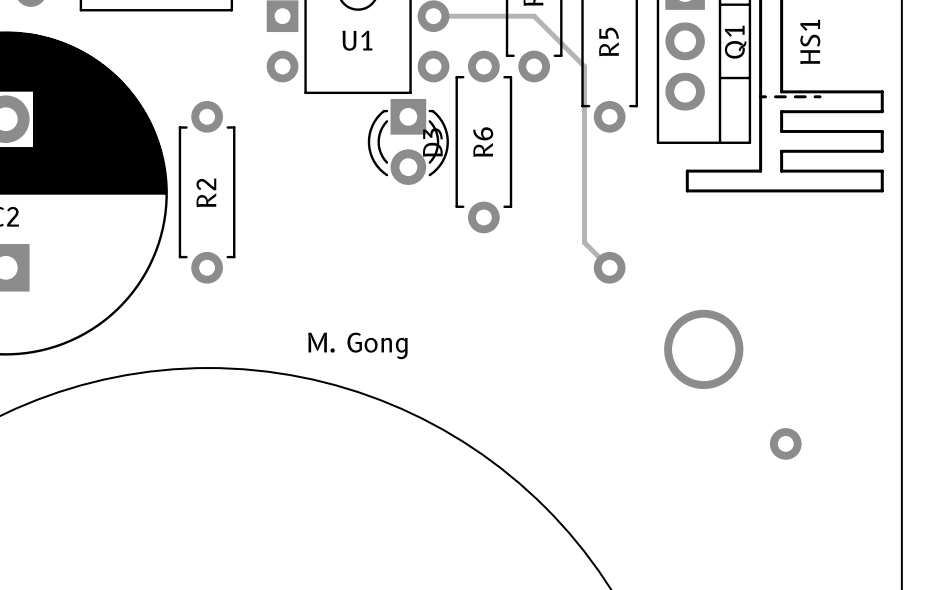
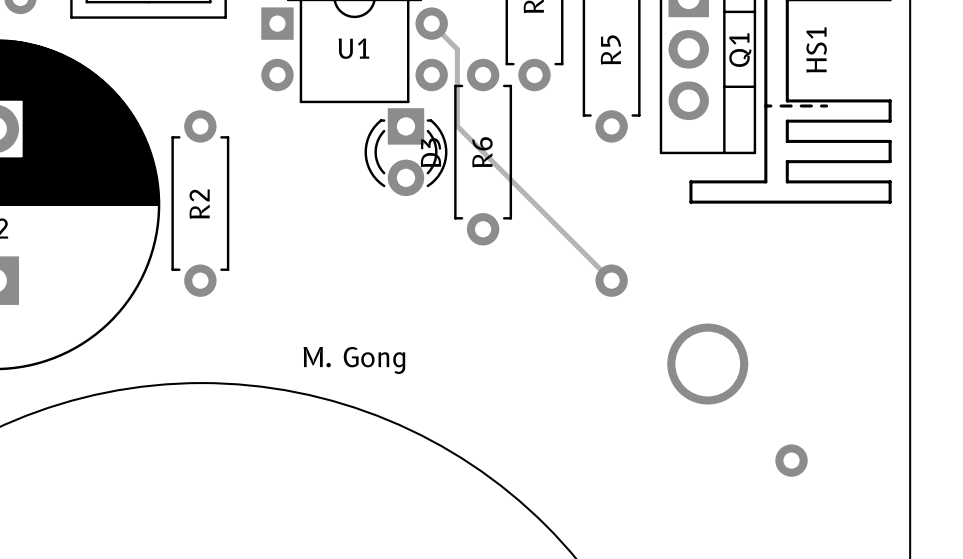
track: (433, 16) (534, 16) (584, 66) (584, 242) -> (431, 23) (457, 49) (457, 126) (585, 254)

